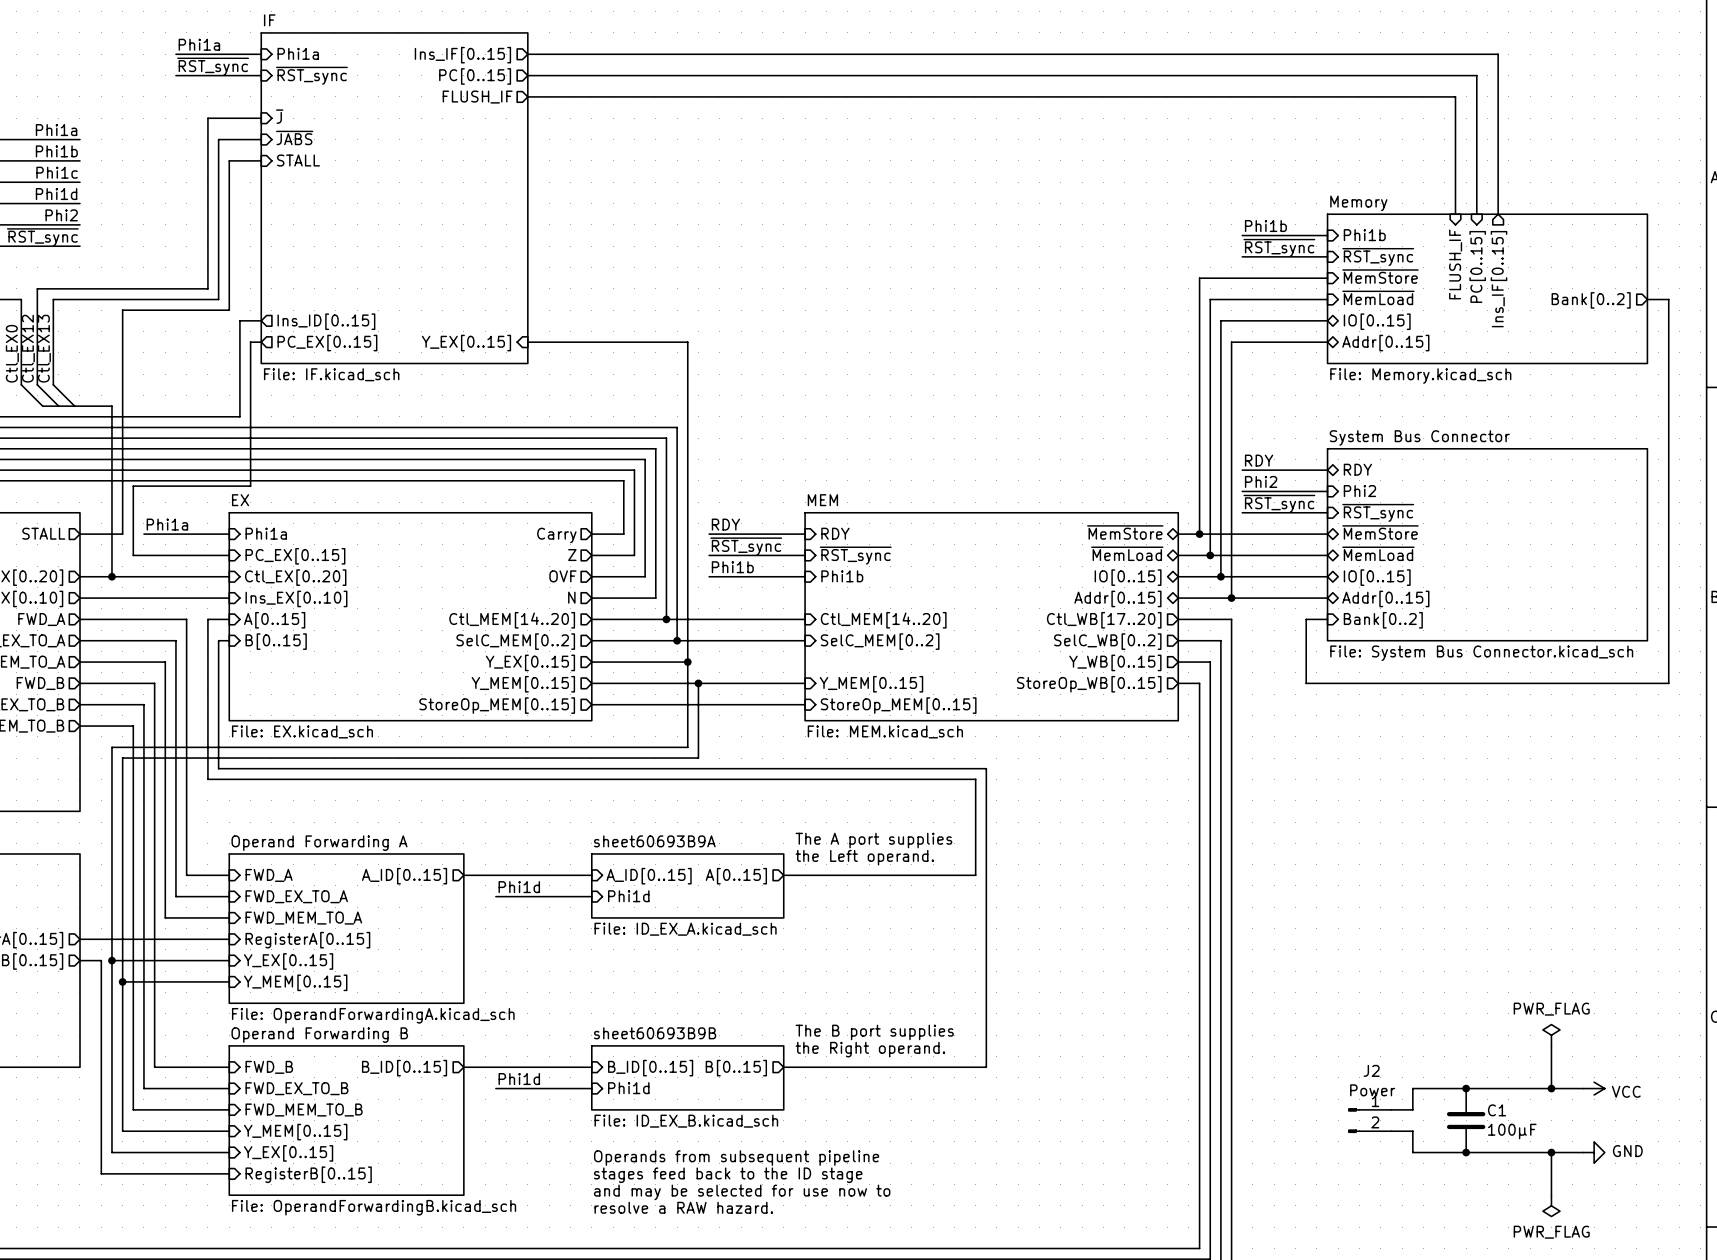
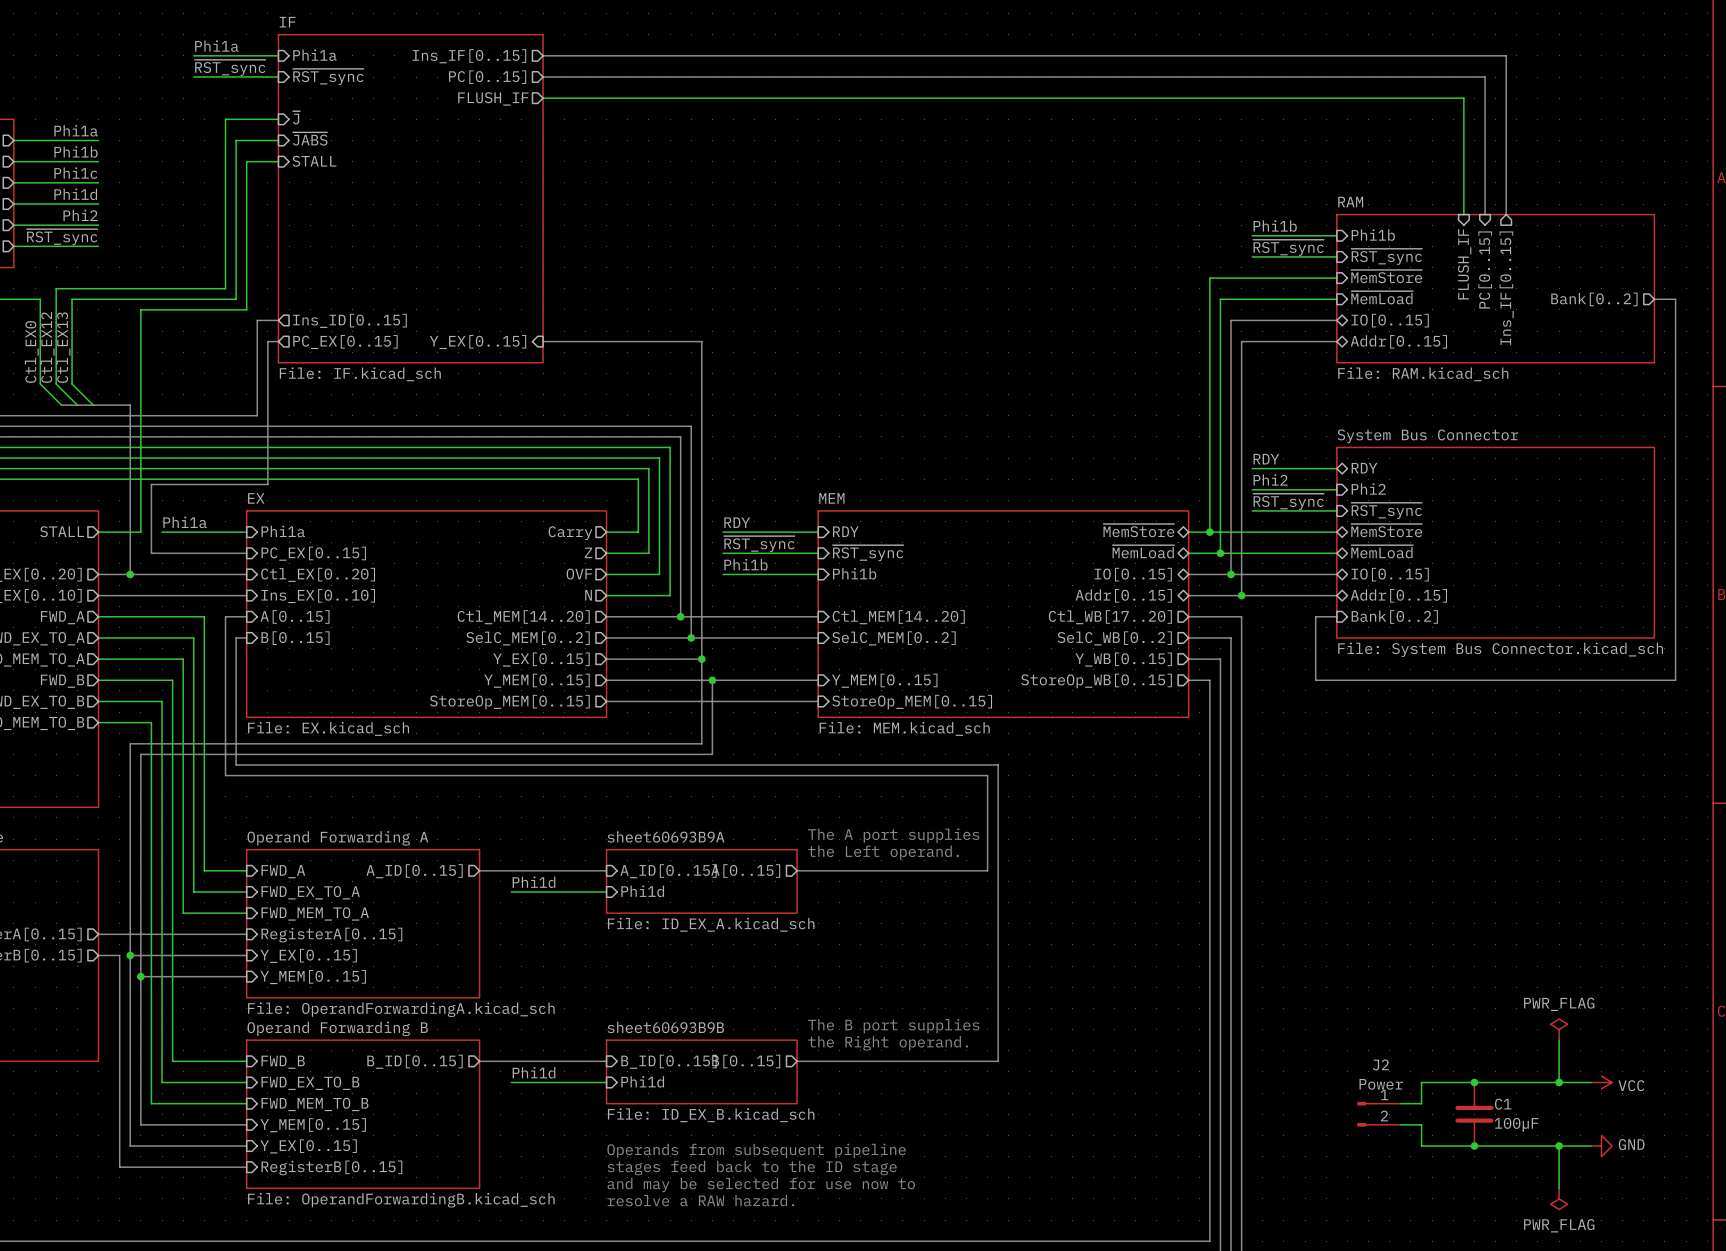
sheet Memory name: Memory (1358, 203) -> RAM (1350, 202)
sheet Memory value: File: Memory.kicad_sch (1420, 376) -> File: RAM.kicad_sch (1423, 374)

